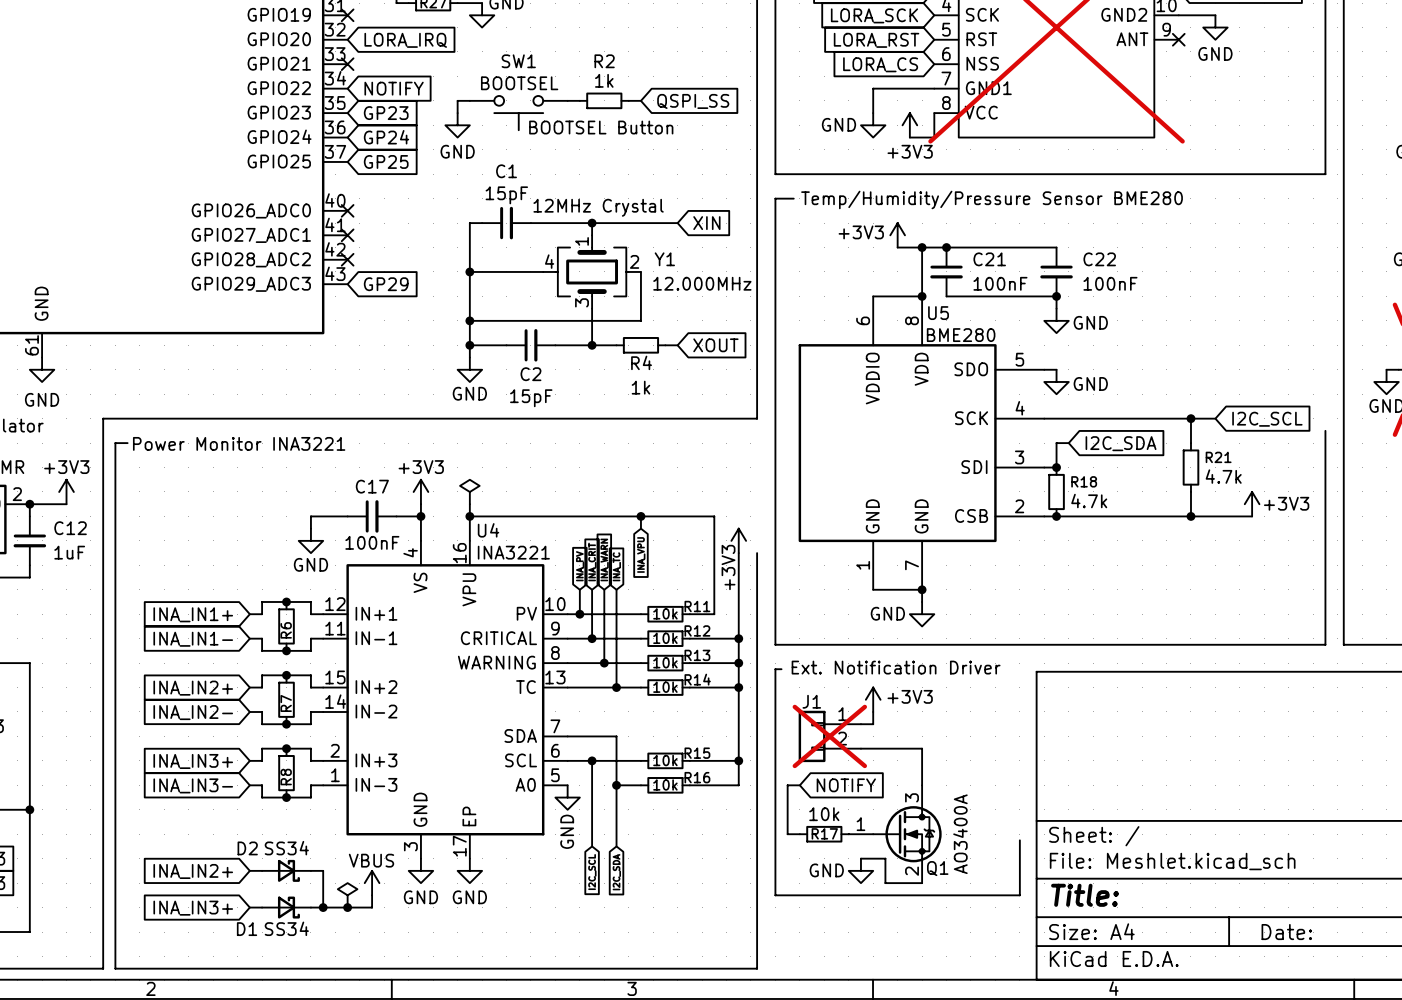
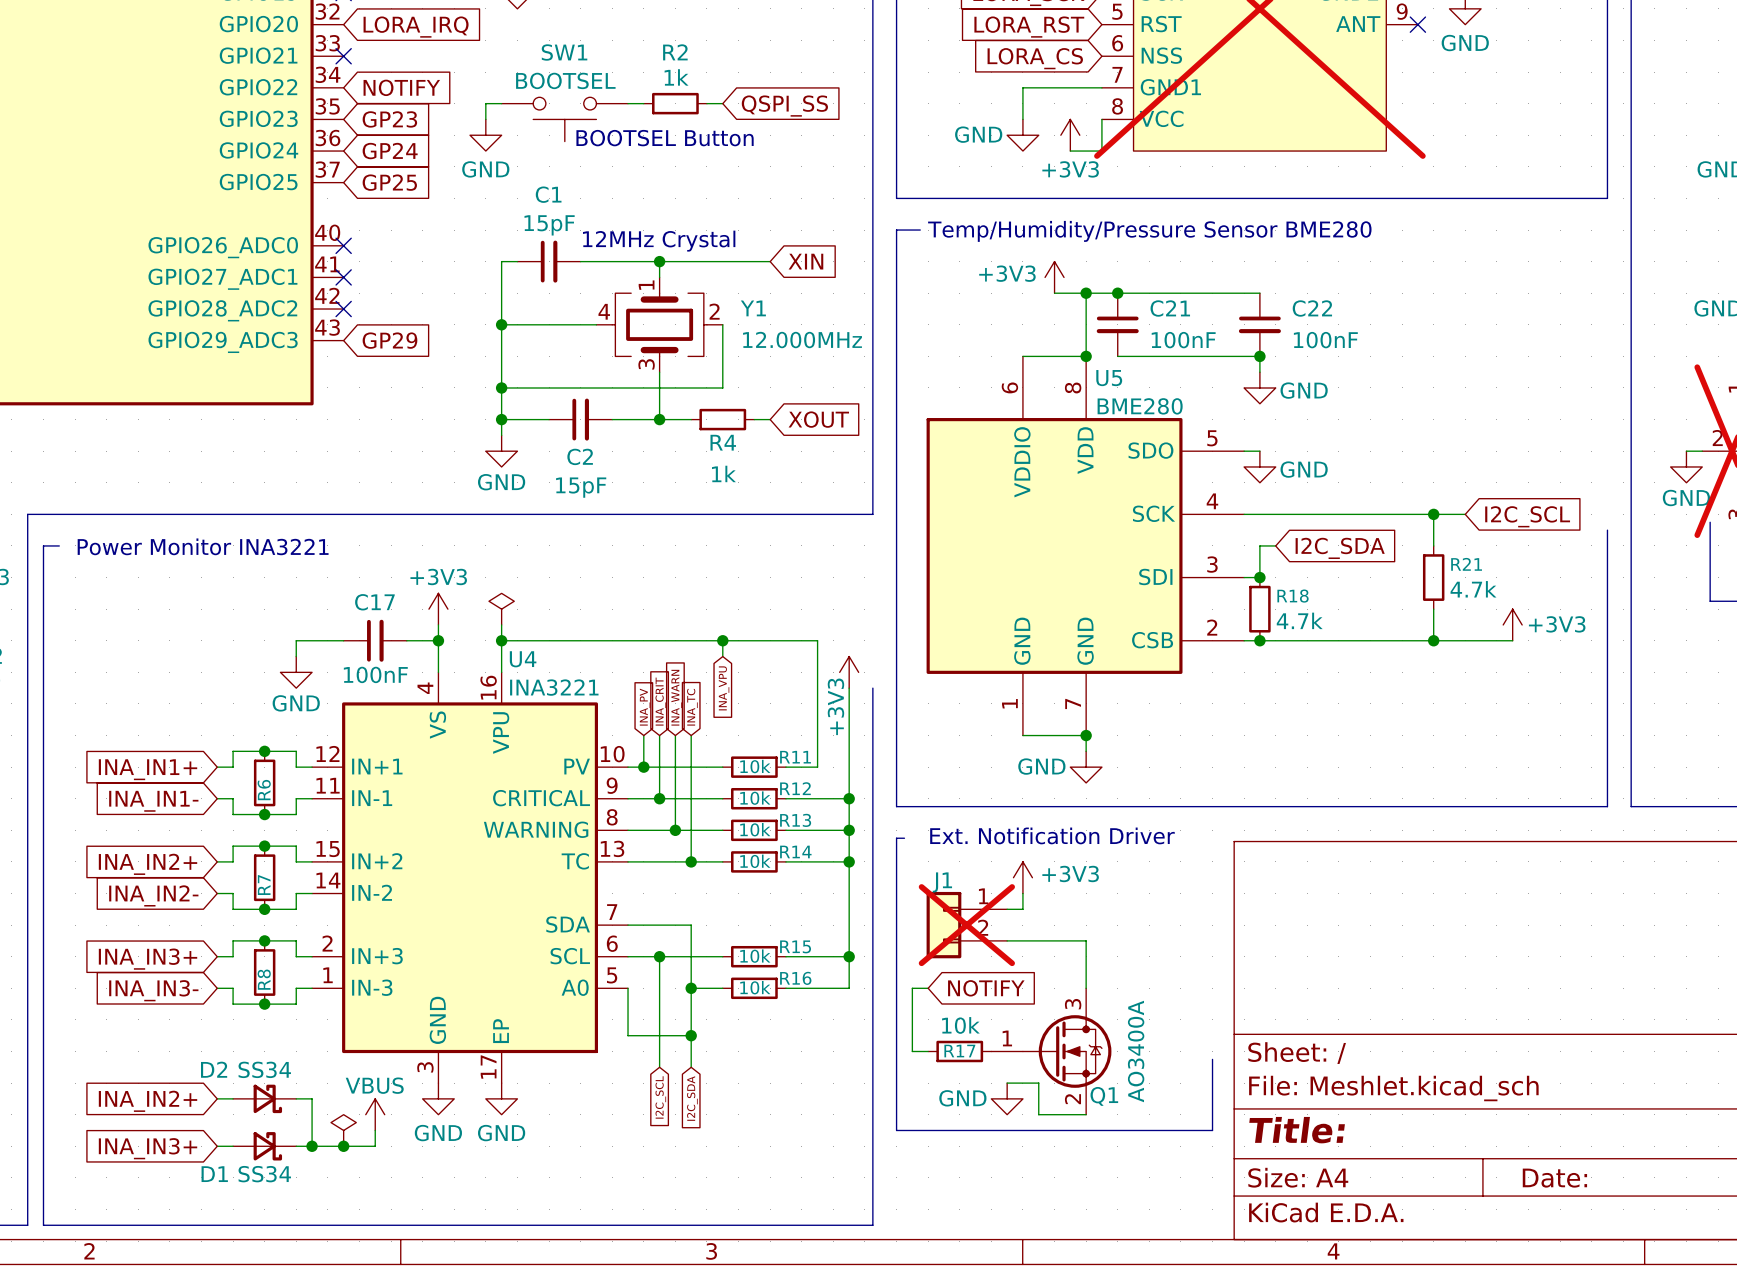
wire: none -> (628, 988) (628, 1035) (691, 1035)
power symbol: GND (567, 797) -> none
junction: none -> (691, 1035)

